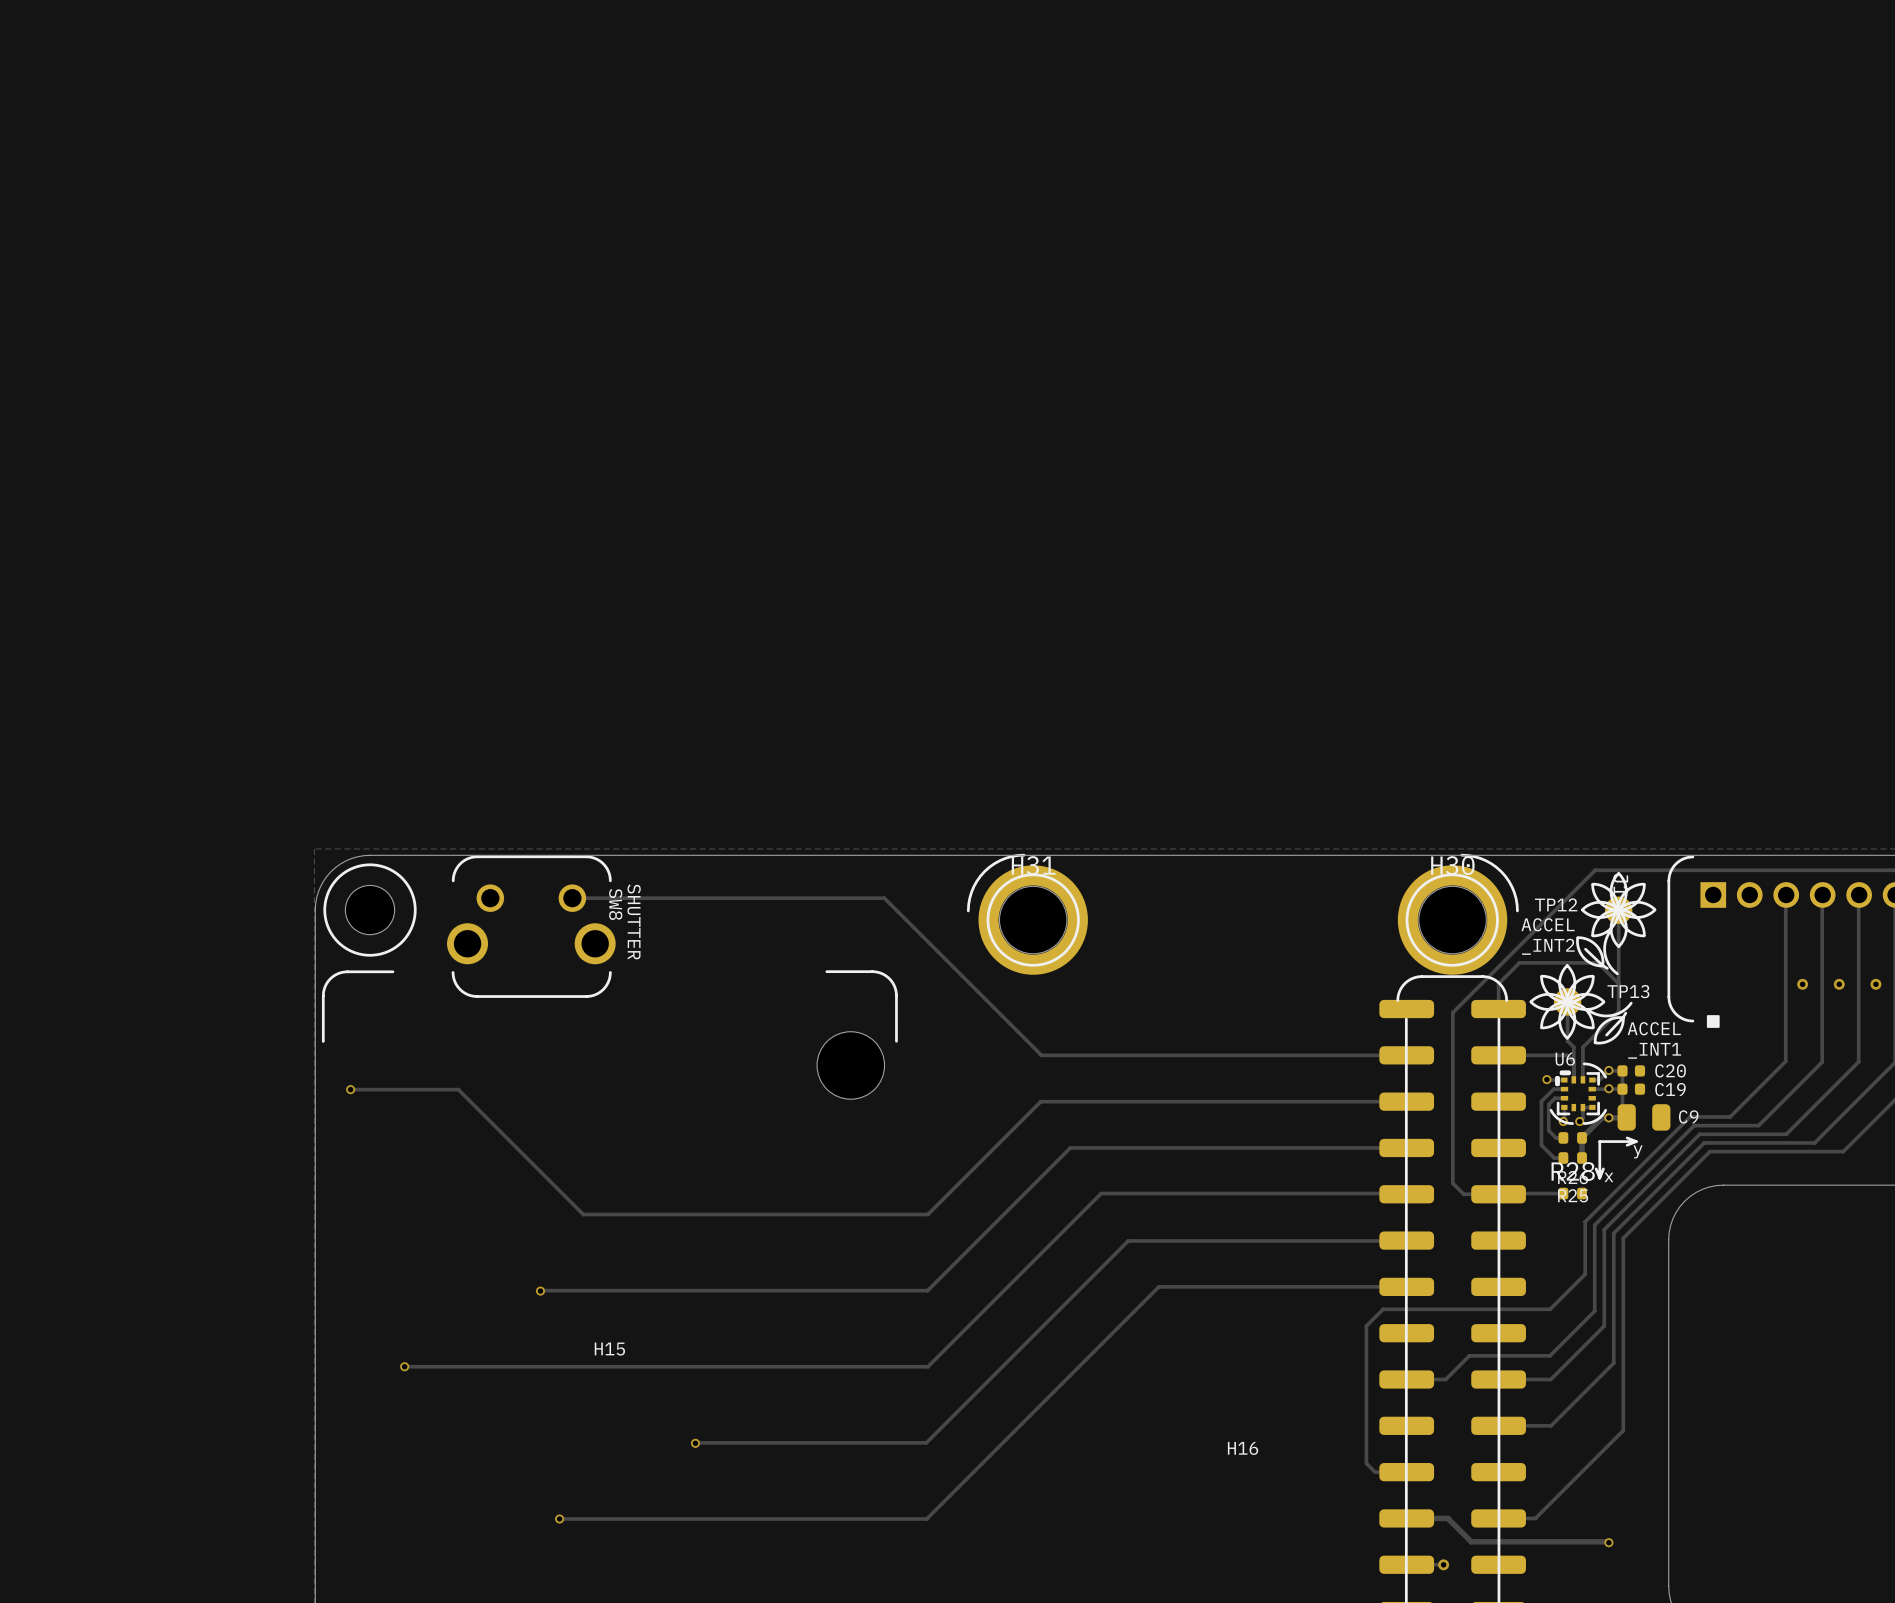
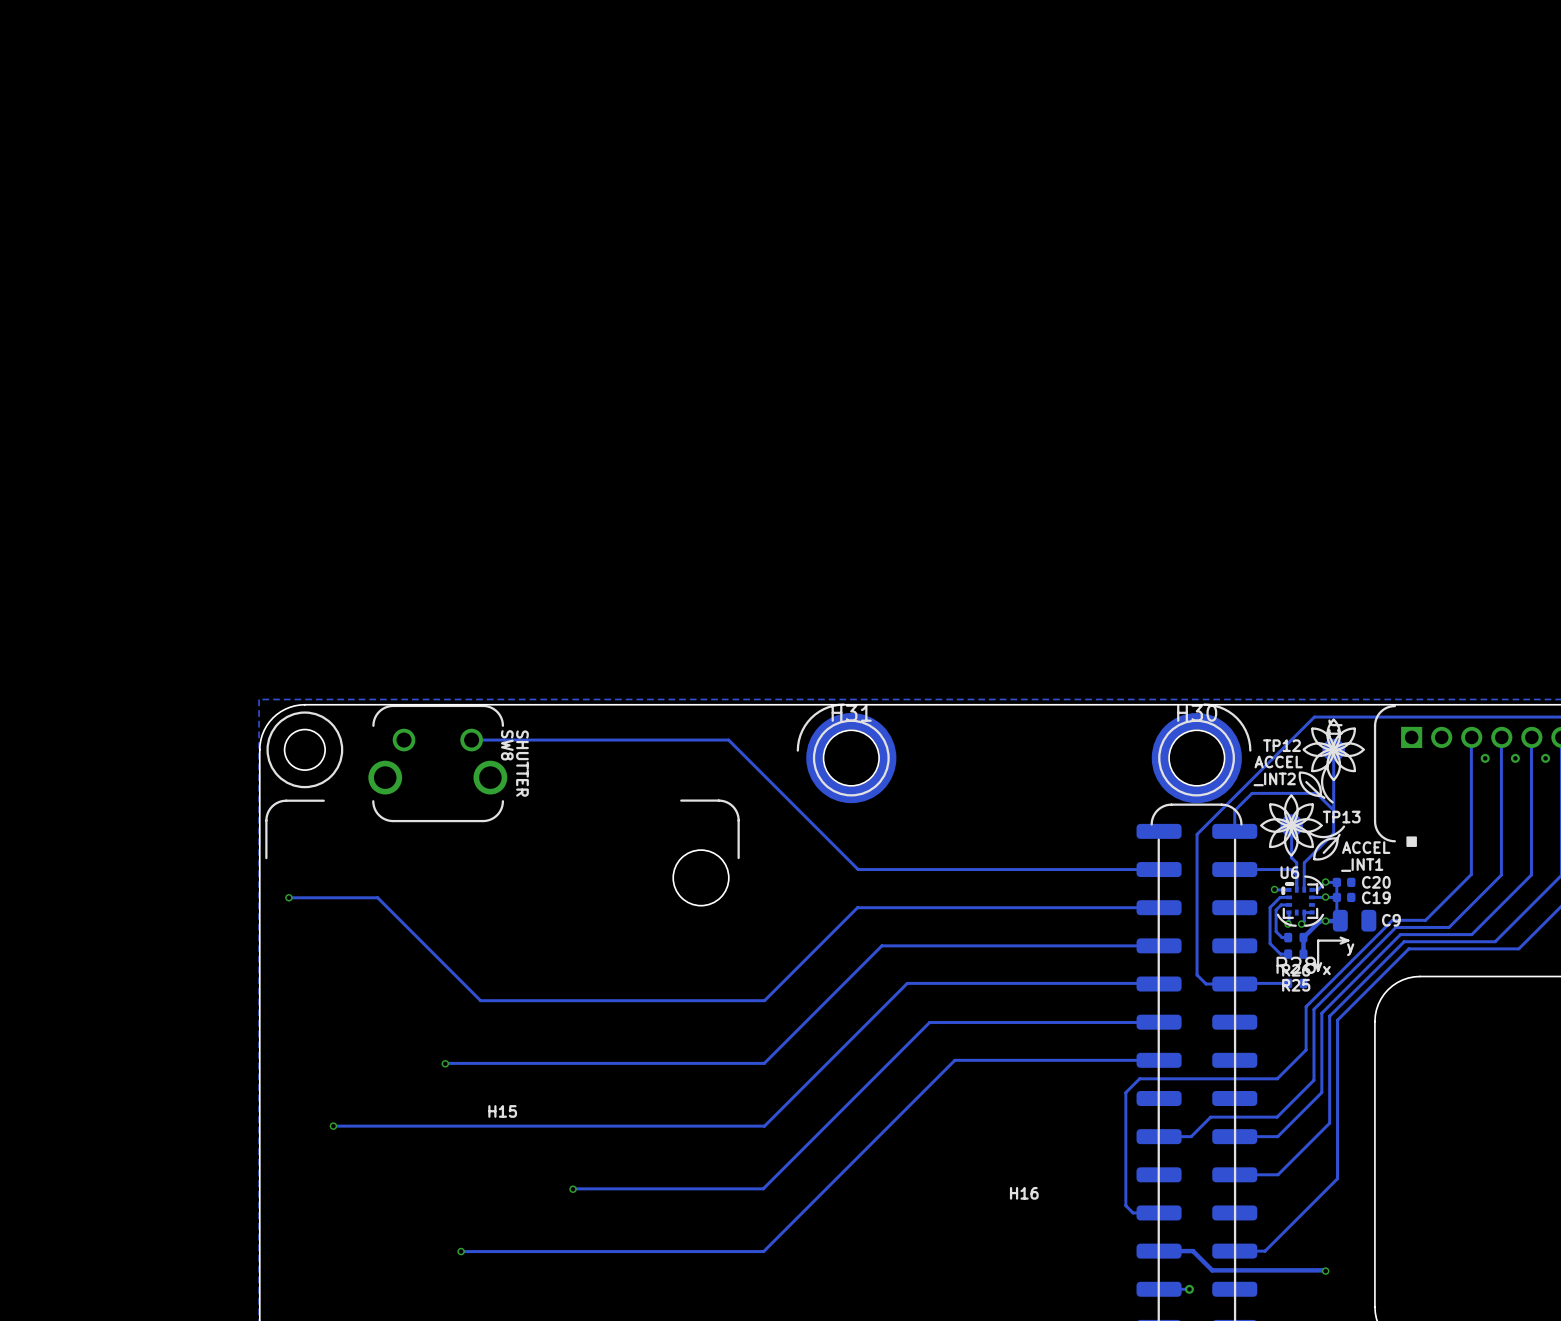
via: none -> (1485, 758)
via: none -> (1515, 758)
via: none -> (1545, 758)
via: (1802, 984) -> none
via: (1839, 984) -> none
via: (1875, 984) -> none

